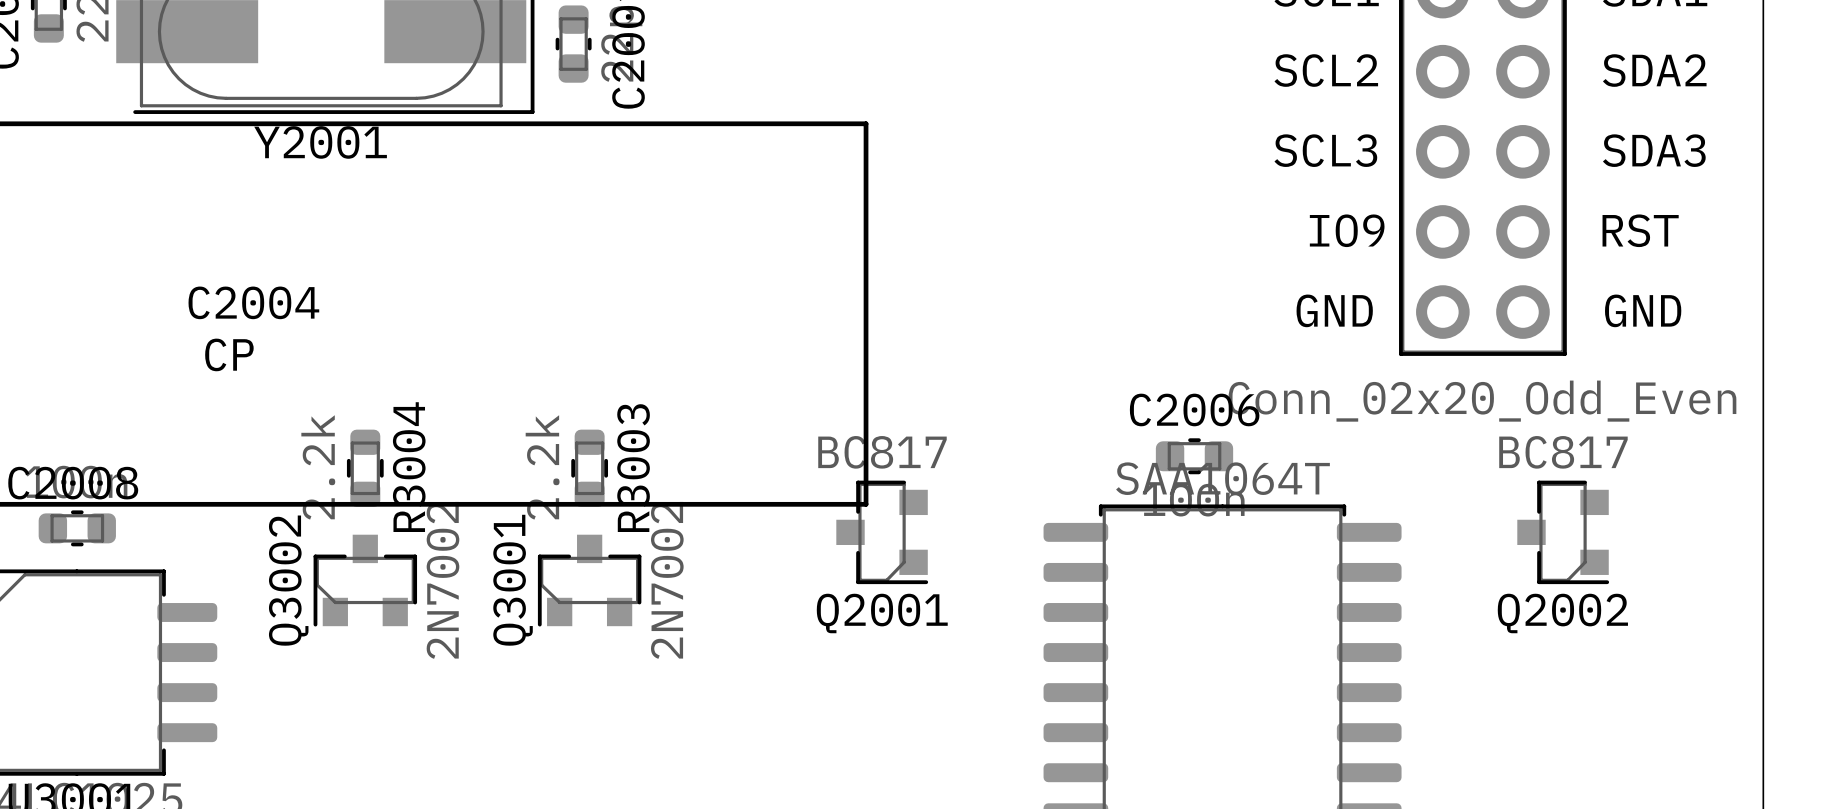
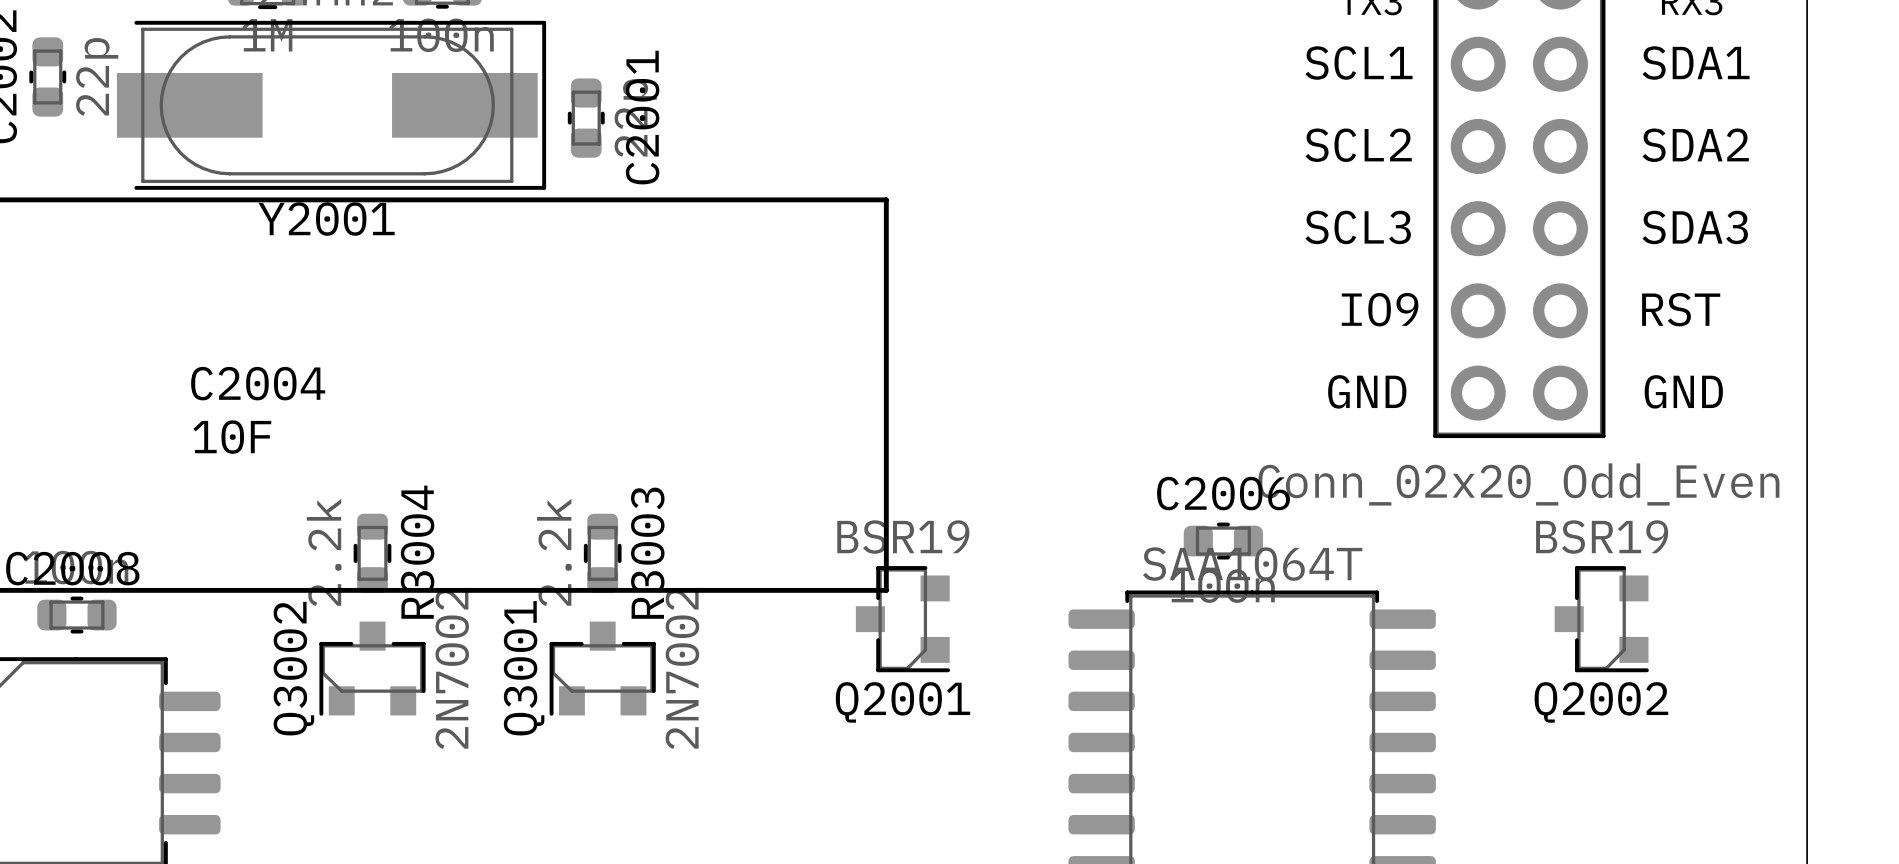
C2004 value: CP (229, 354) -> 10F (232, 437)
Q2001 value: BC817 (882, 452) -> BSR19 (903, 537)
Q2002 value: BC817 (1563, 452) -> BSR19 (1602, 537)

